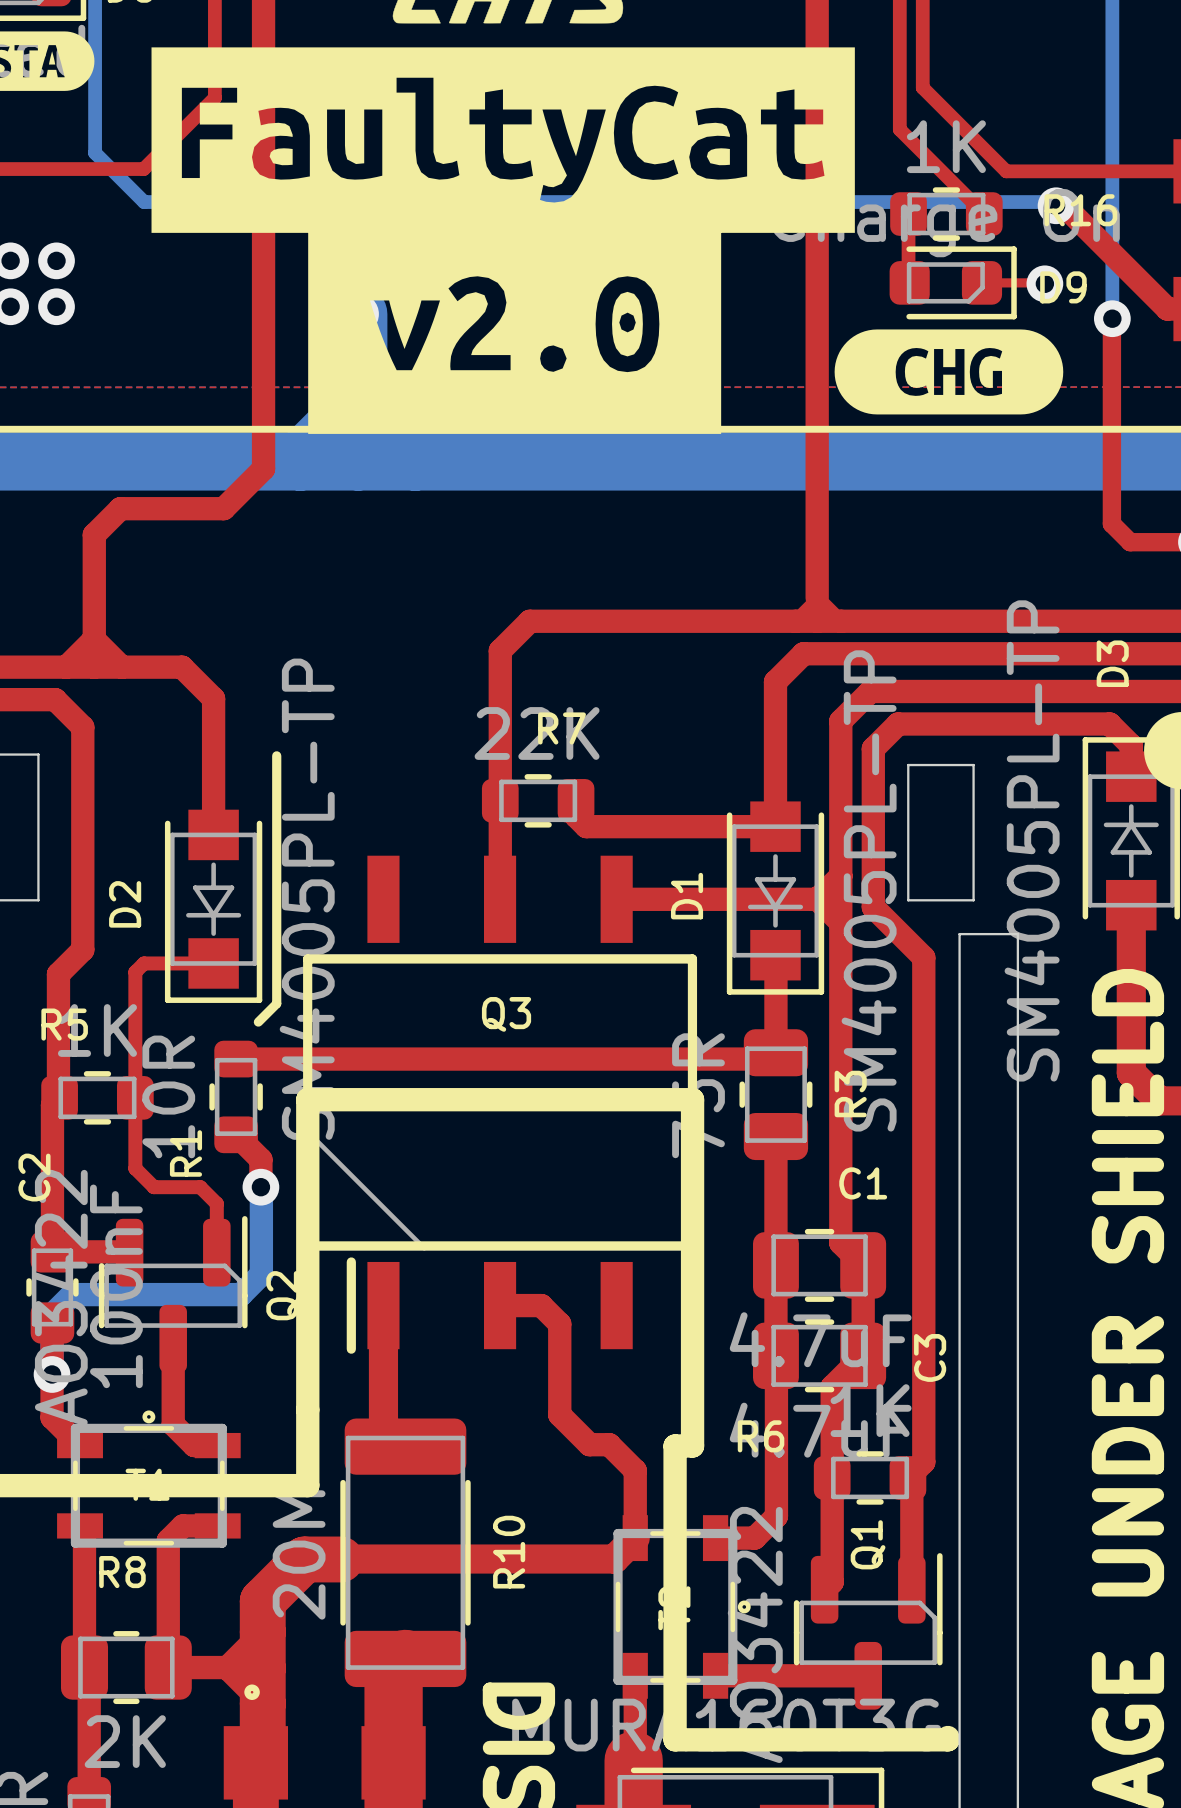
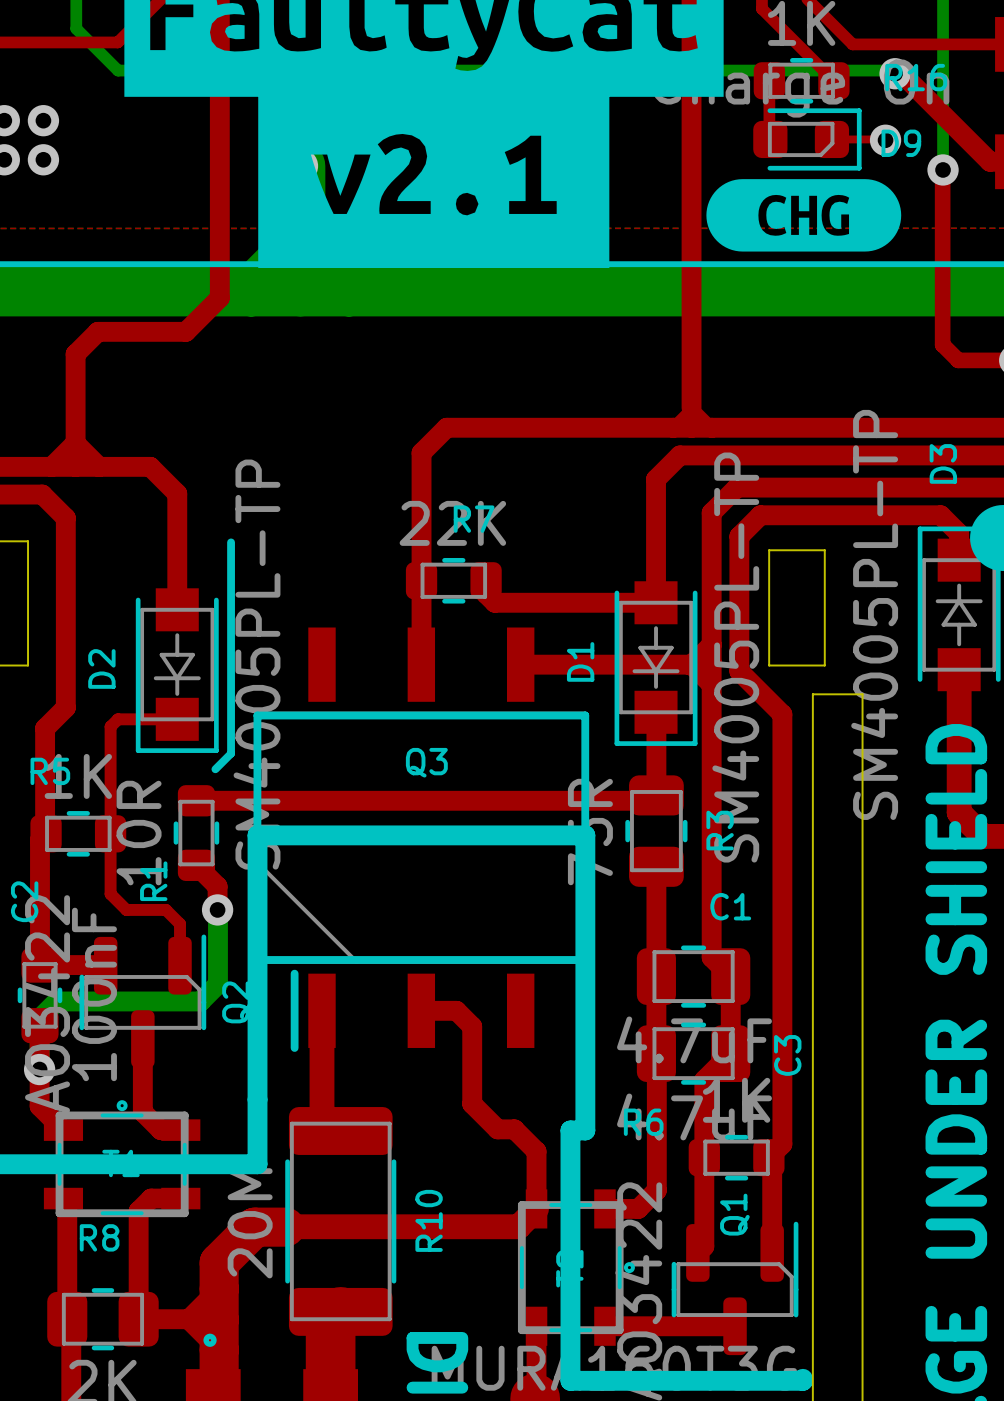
drawing shape: [308, 214, 722, 434] -> [258, 81, 610, 269]

